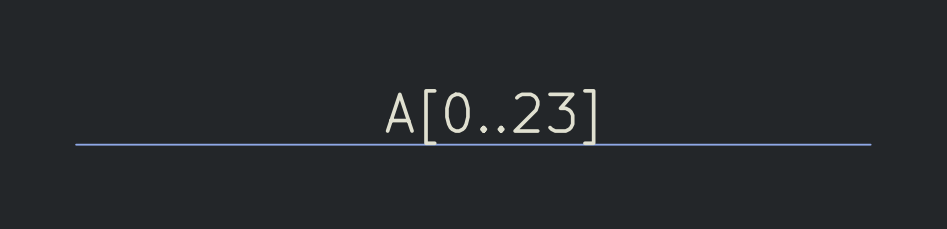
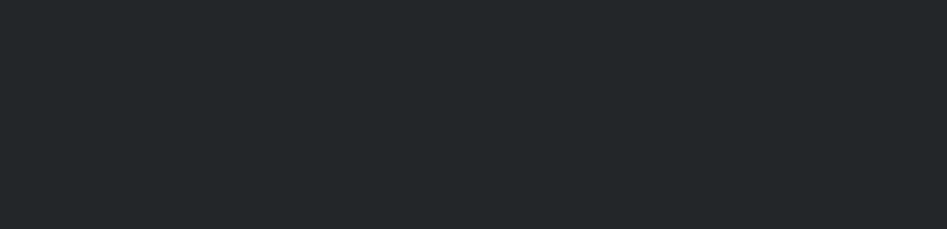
label: A[0..23] (490, 117) -> none
bus: (76, 144) (870, 144) -> none

